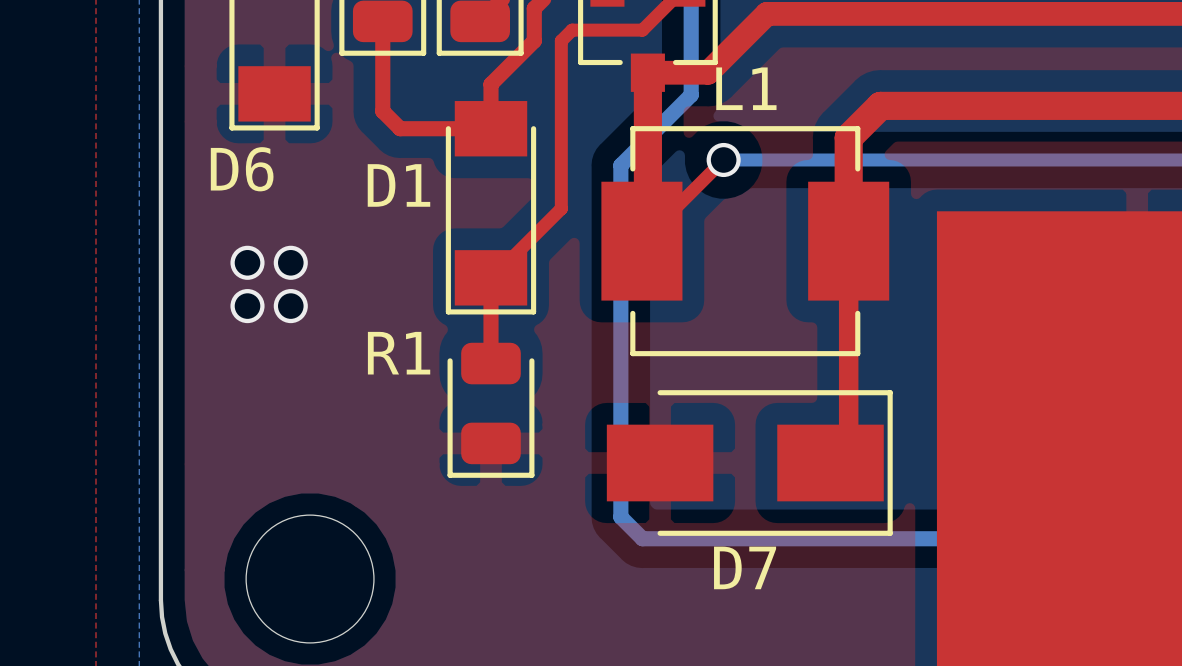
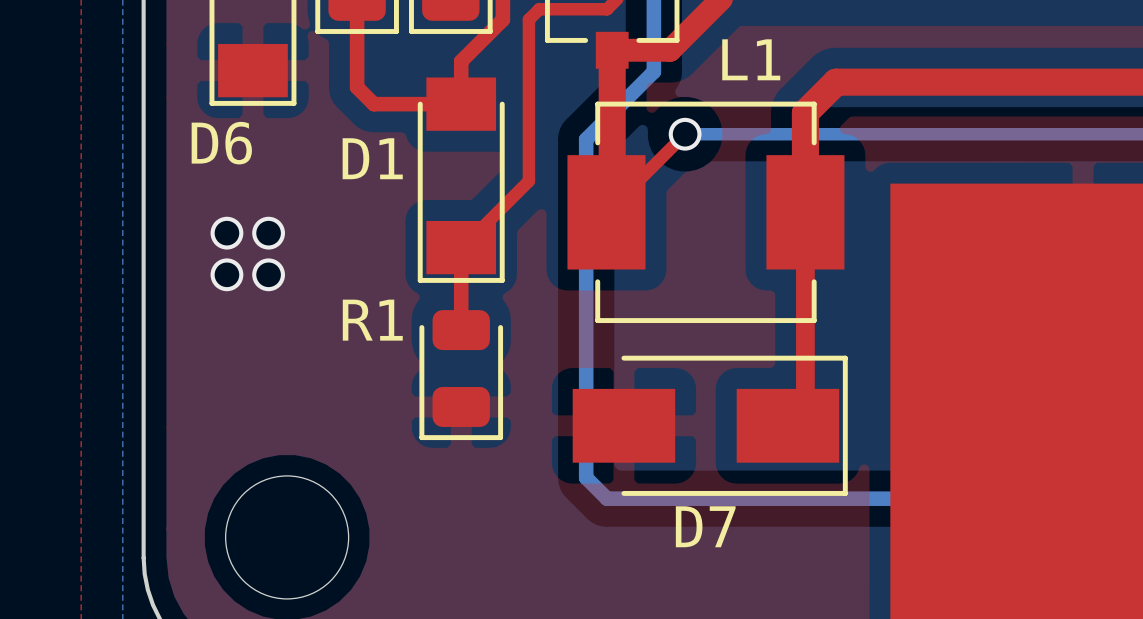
L1 name position: L1 (746, 88) -> L1 (751, 59)

